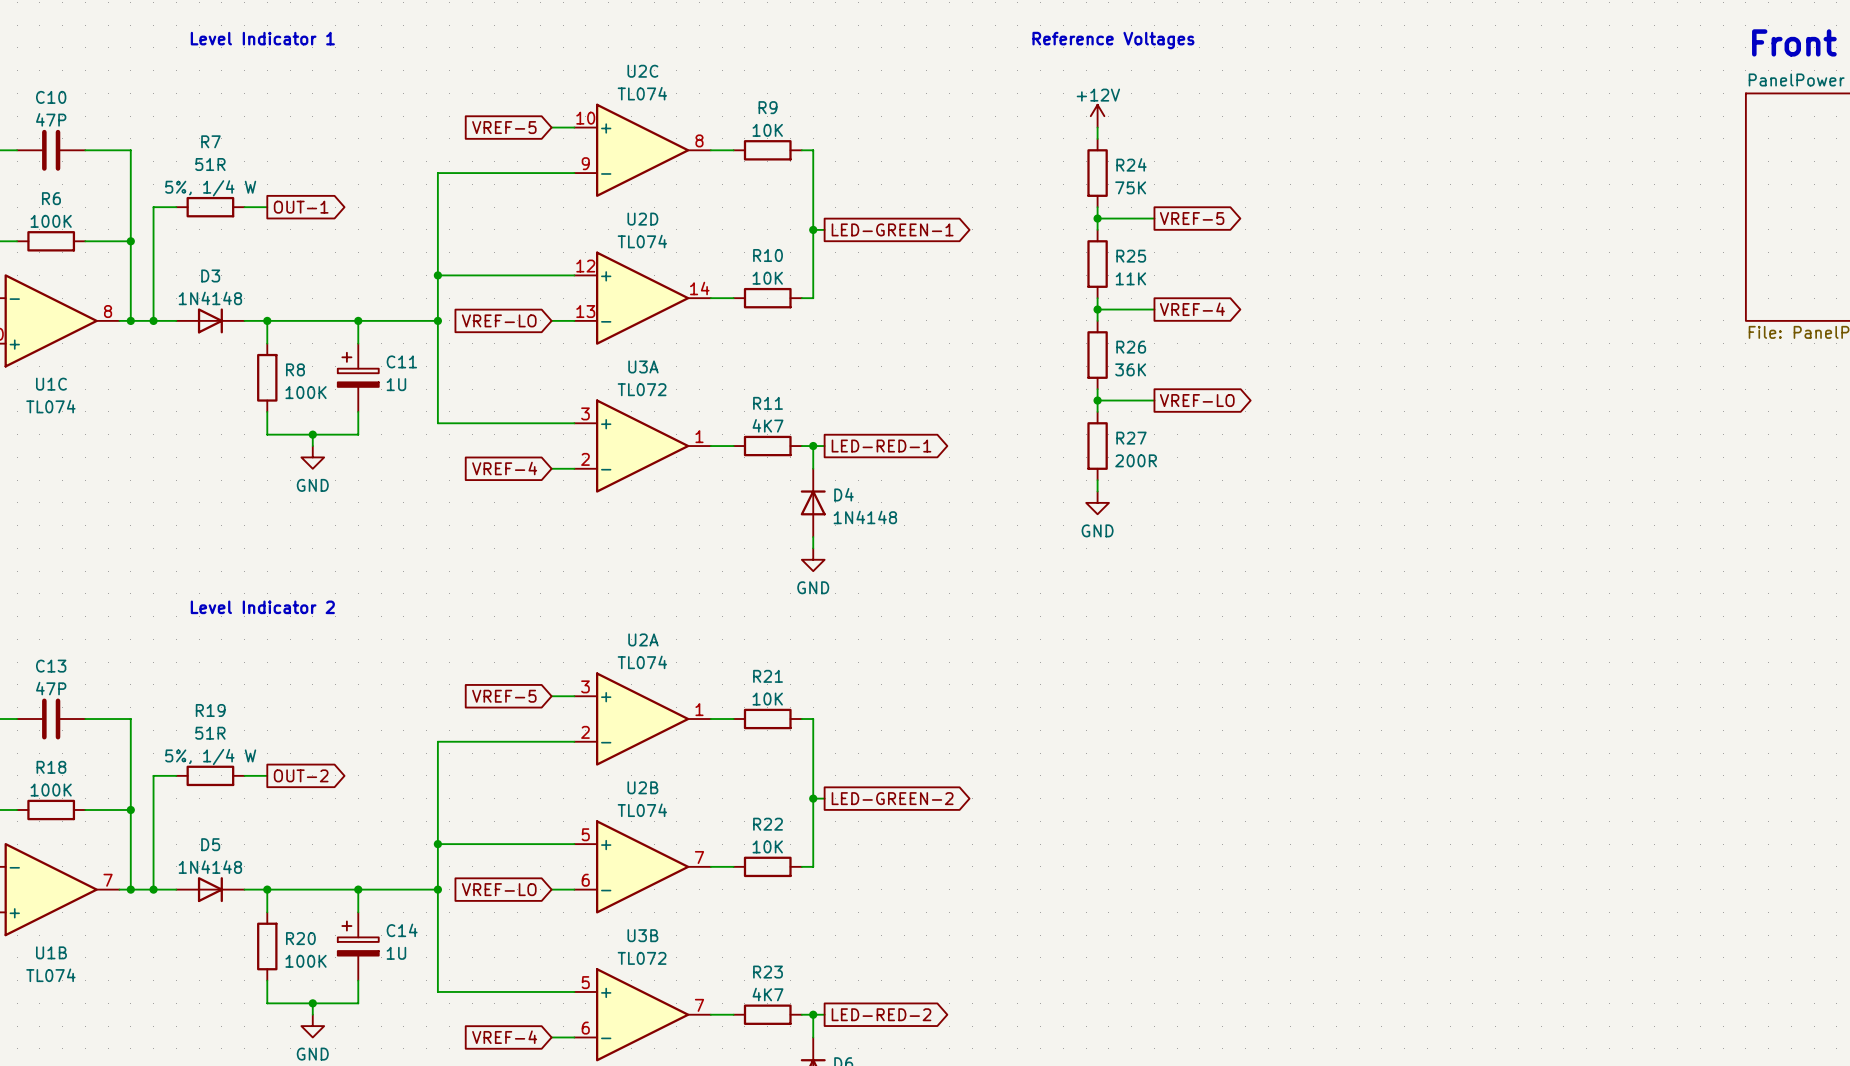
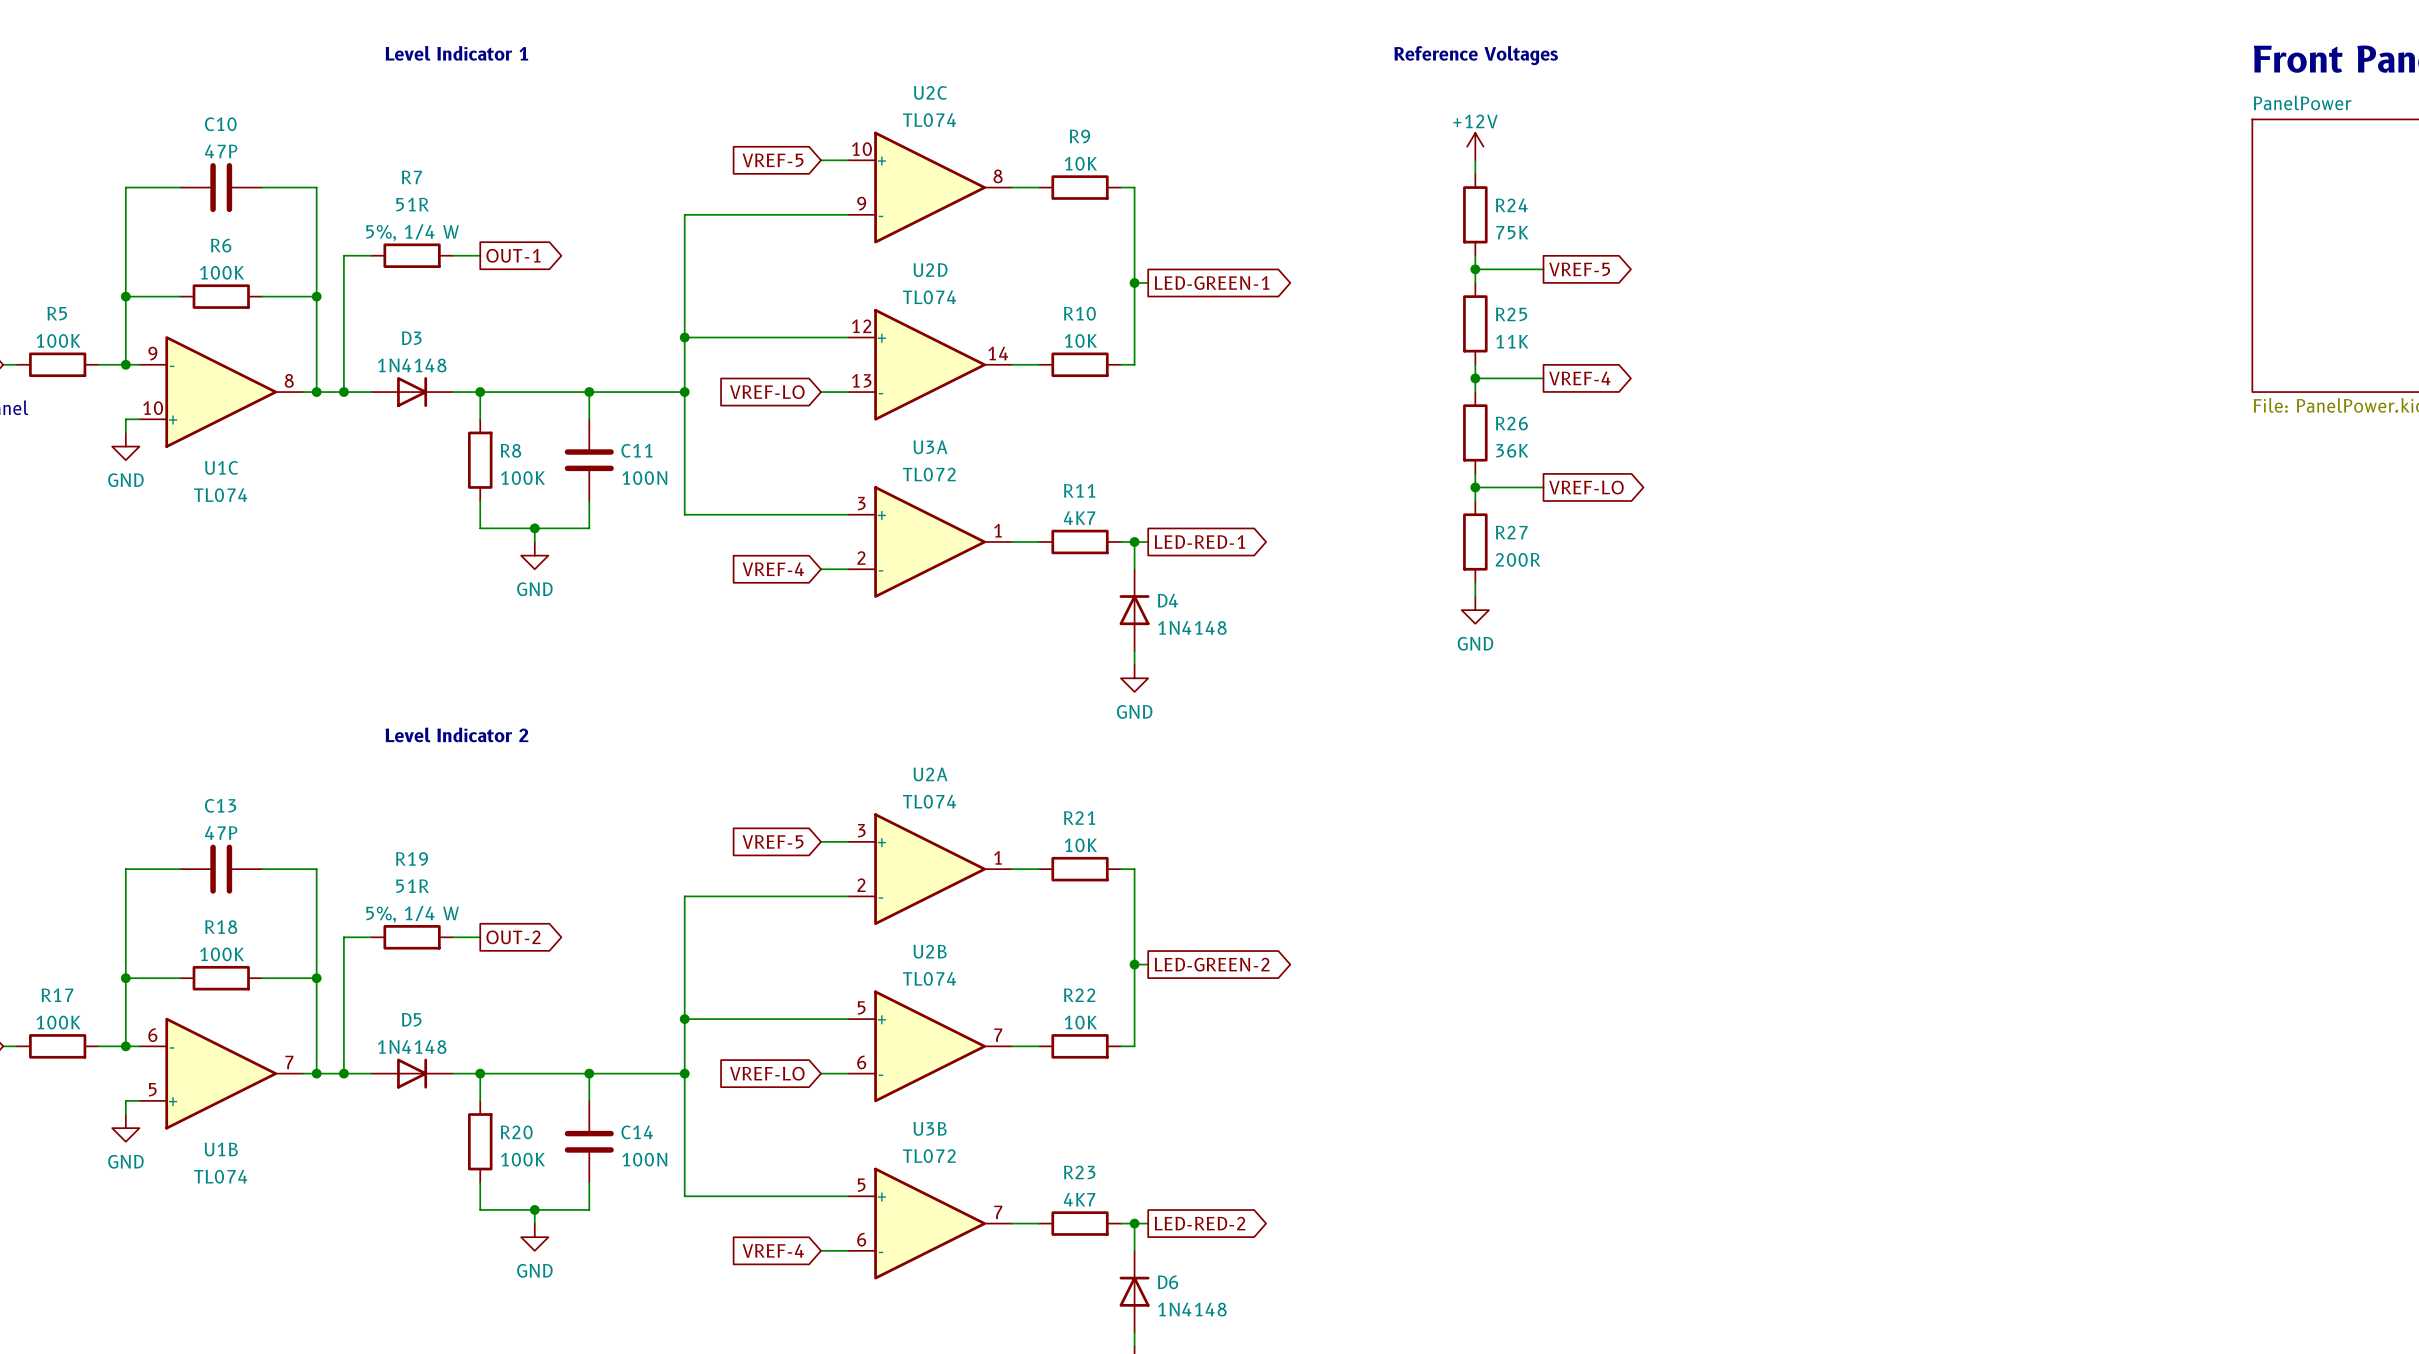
C11 symbol: [337, 343, 379, 412] -> [564, 419, 614, 502]
C11 value: 1U (396, 384) -> 100N (644, 478)
C14 symbol: [337, 912, 379, 981] -> [564, 1100, 614, 1183]
C14 value: 1U (396, 953) -> 100N (644, 1159)

